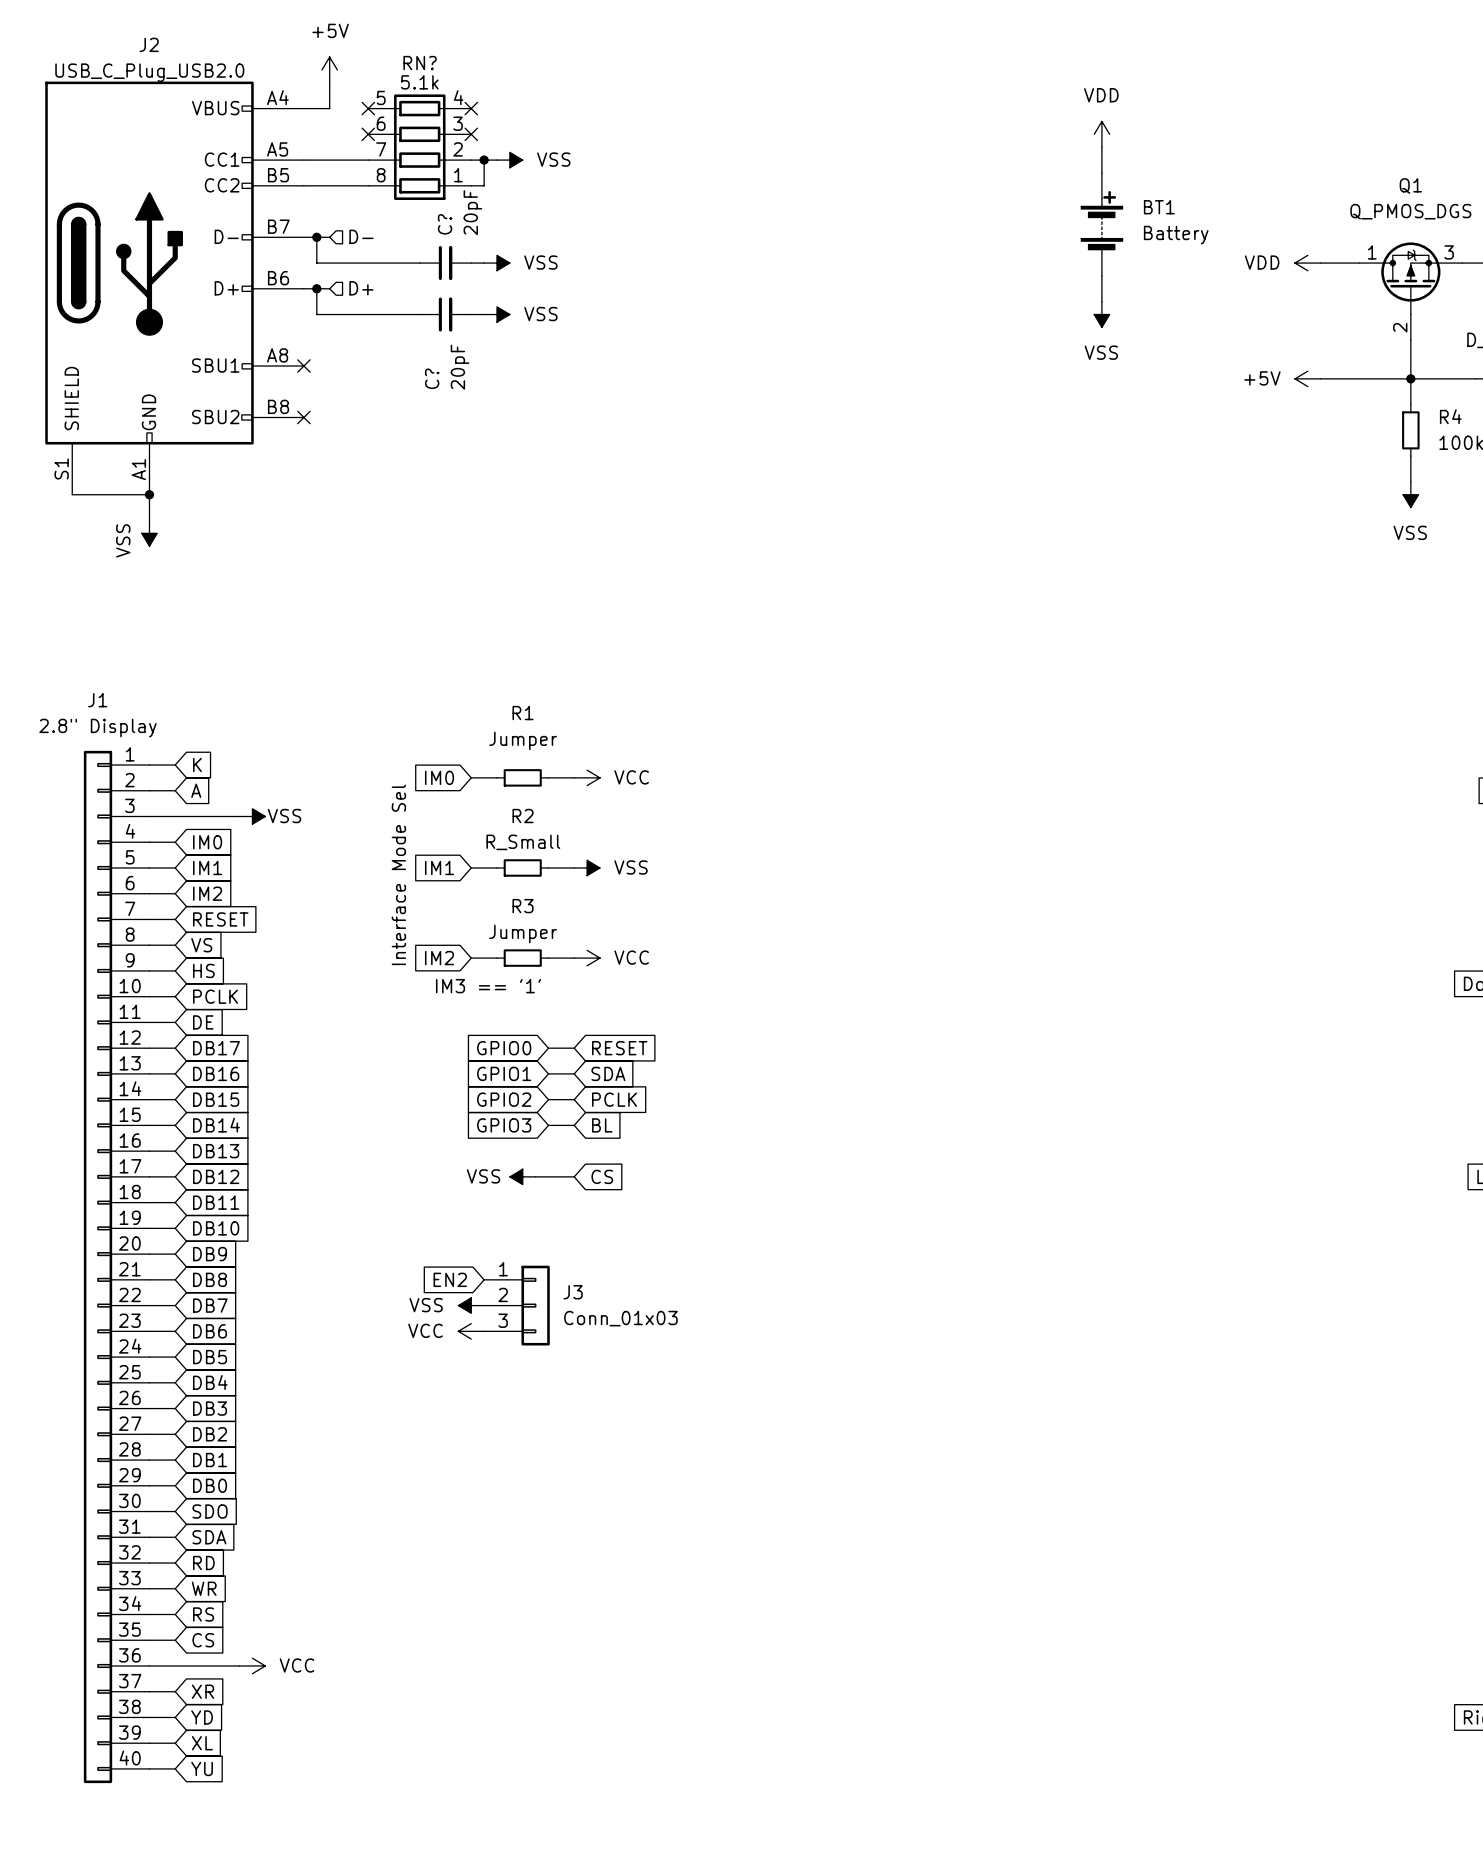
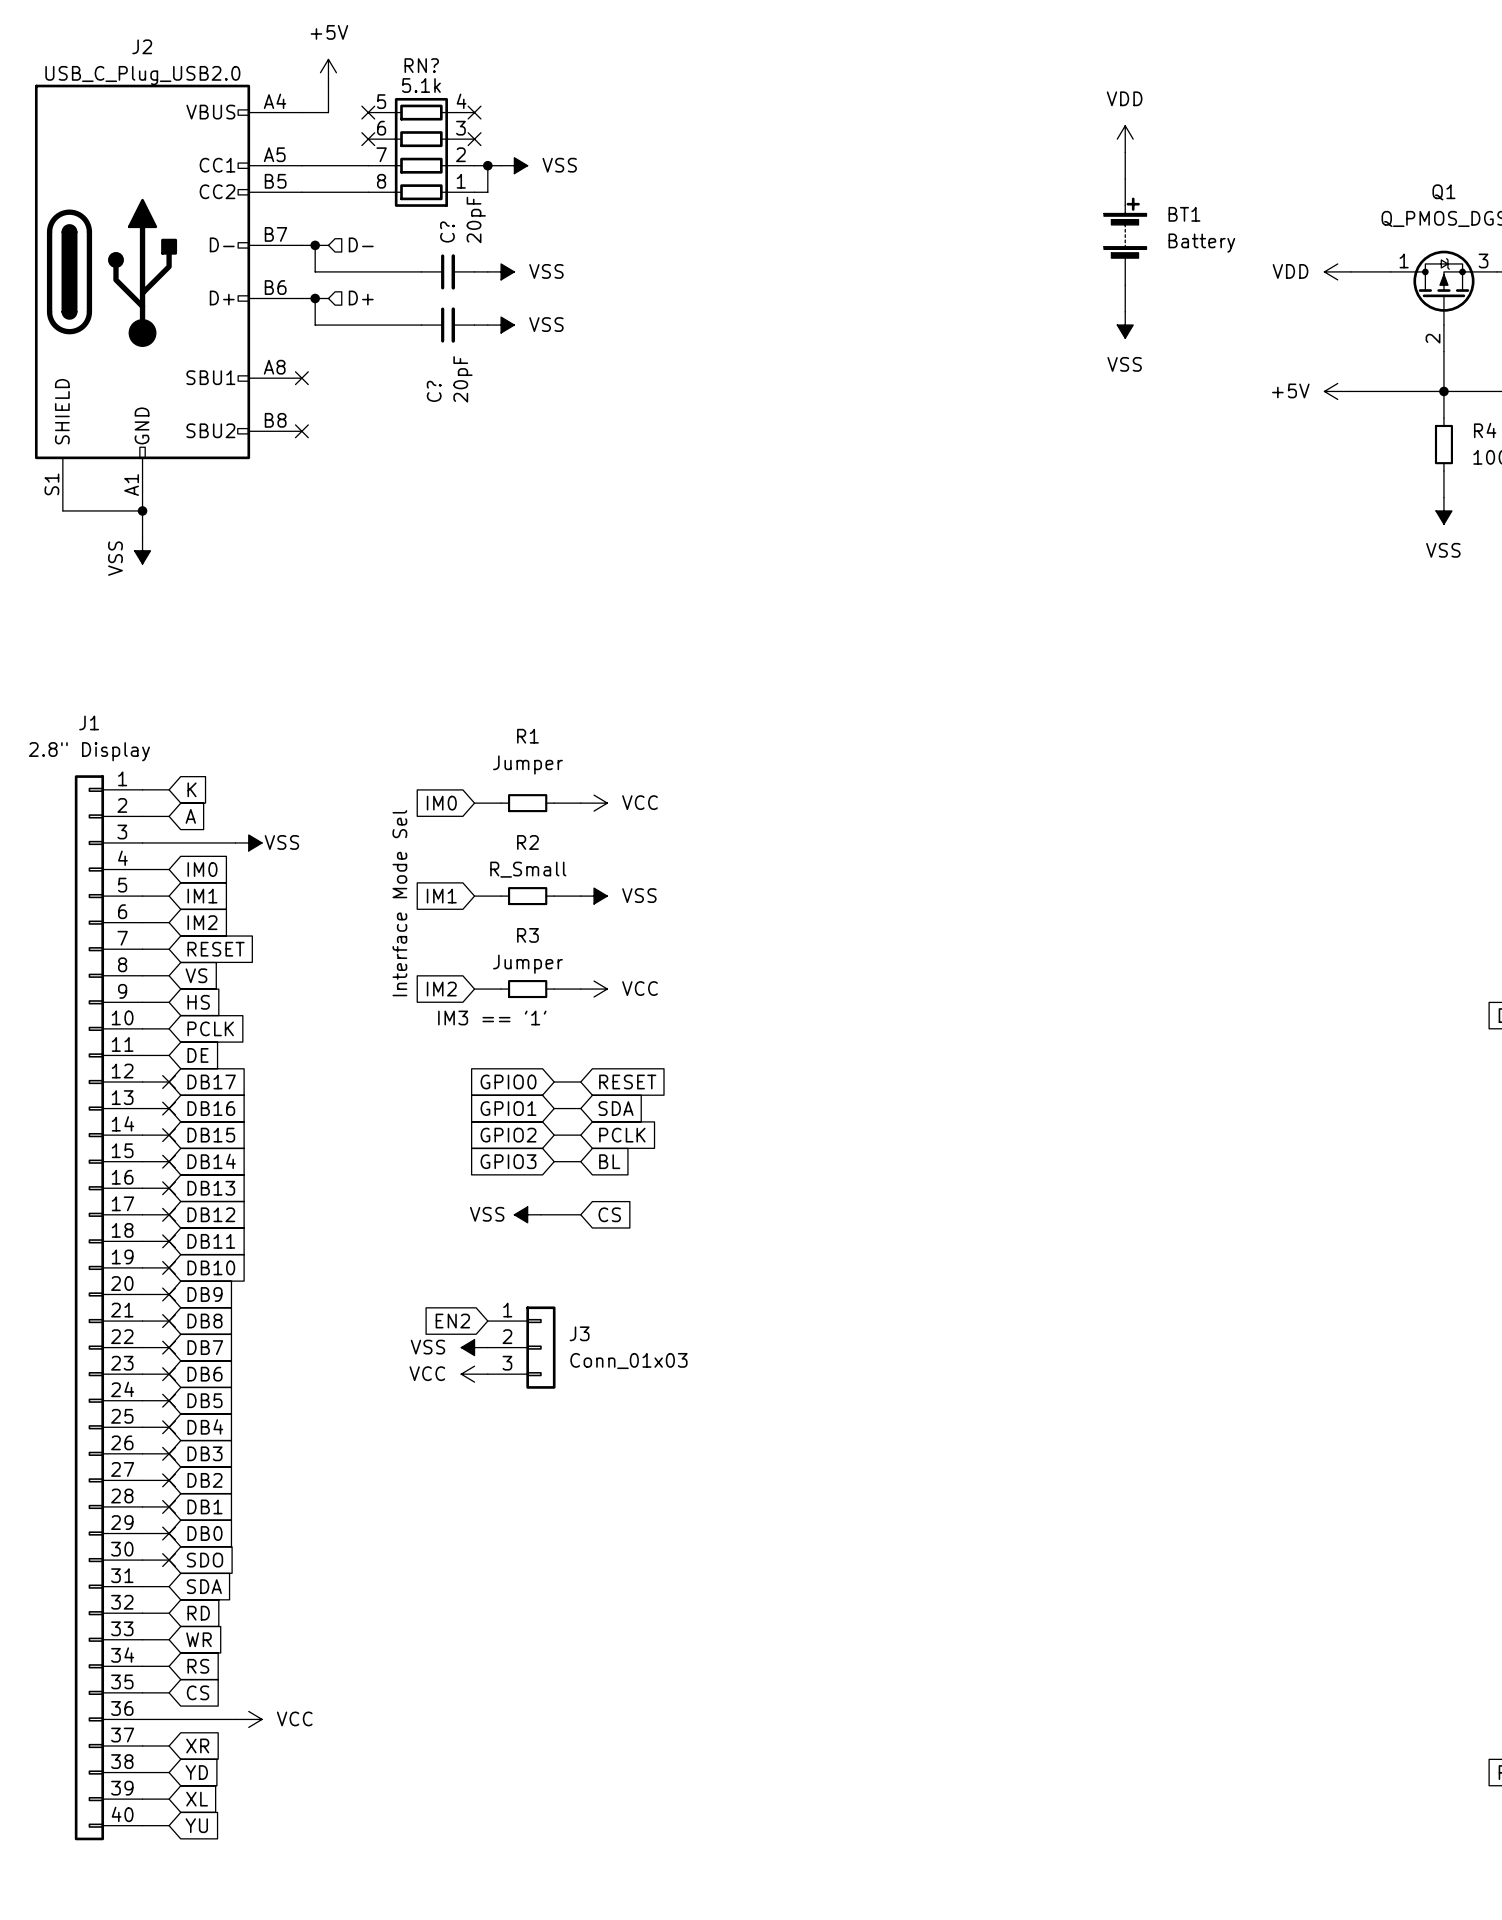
no-connect mark: none -> (169, 1082)
no-connect mark: none -> (169, 1108)
no-connect mark: none -> (169, 1135)
no-connect mark: none -> (169, 1161)
no-connect mark: none -> (169, 1188)
no-connect mark: none -> (169, 1214)
no-connect mark: none -> (169, 1241)
no-connect mark: none -> (169, 1267)
no-connect mark: none -> (169, 1294)
no-connect mark: none -> (169, 1321)
no-connect mark: none -> (169, 1347)
no-connect mark: none -> (169, 1374)
no-connect mark: none -> (169, 1400)
no-connect mark: none -> (169, 1427)
no-connect mark: none -> (169, 1453)
no-connect mark: none -> (169, 1480)
no-connect mark: none -> (169, 1506)
no-connect mark: none -> (169, 1533)
no-connect mark: none -> (169, 1560)

